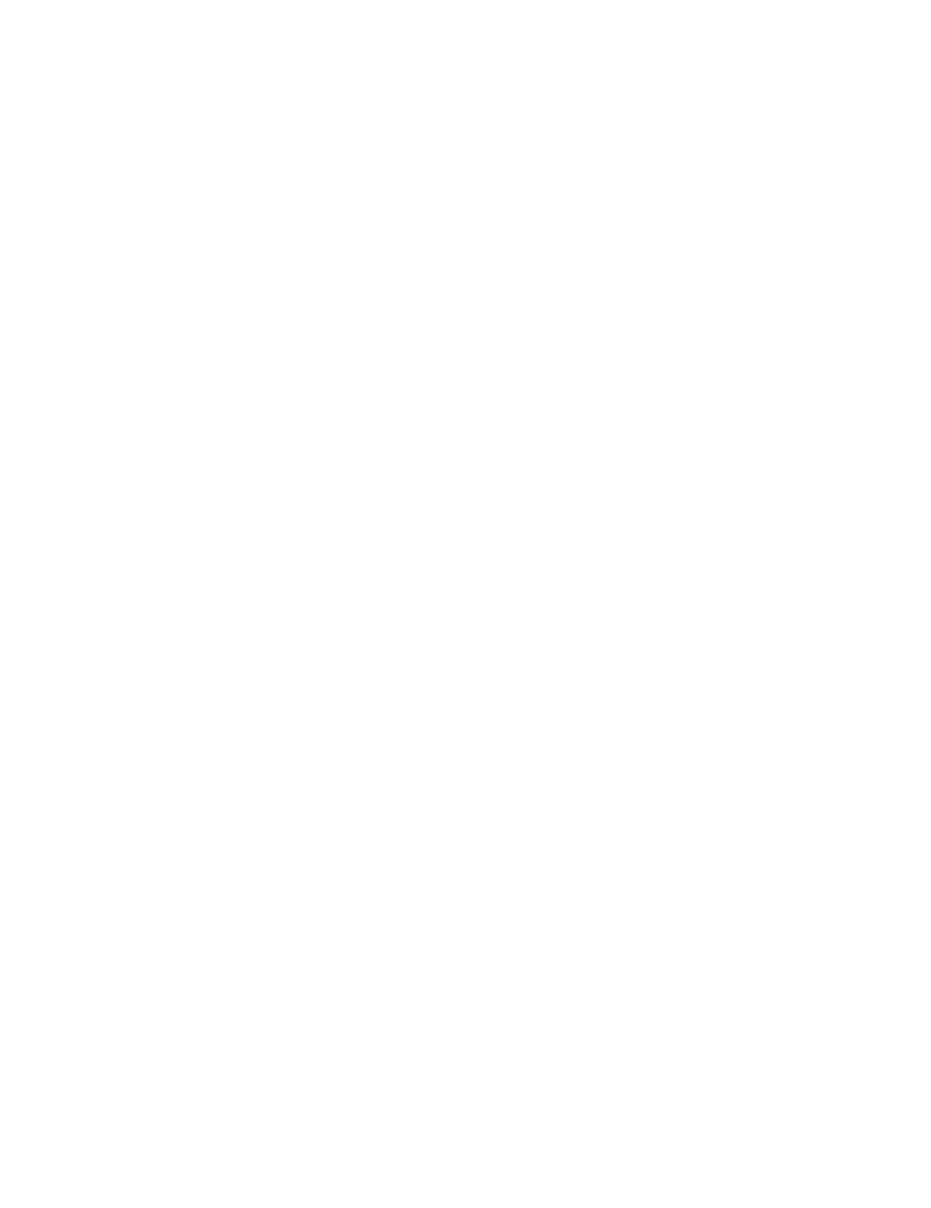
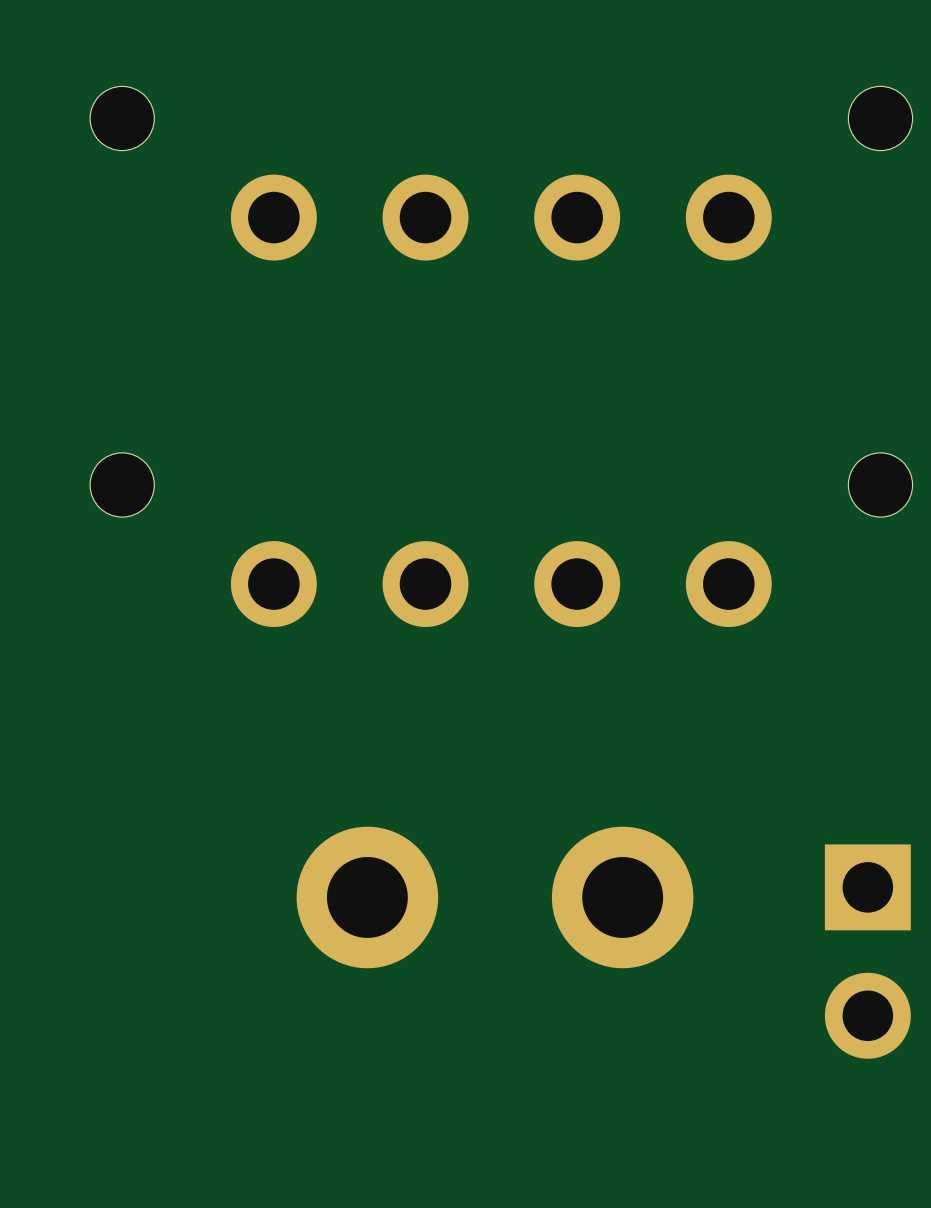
part: none -> (501, 173)
part: none -> (501, 539)
part: none -> (367, 897)
part: none -> (622, 897)
part: none -> (867, 951)

